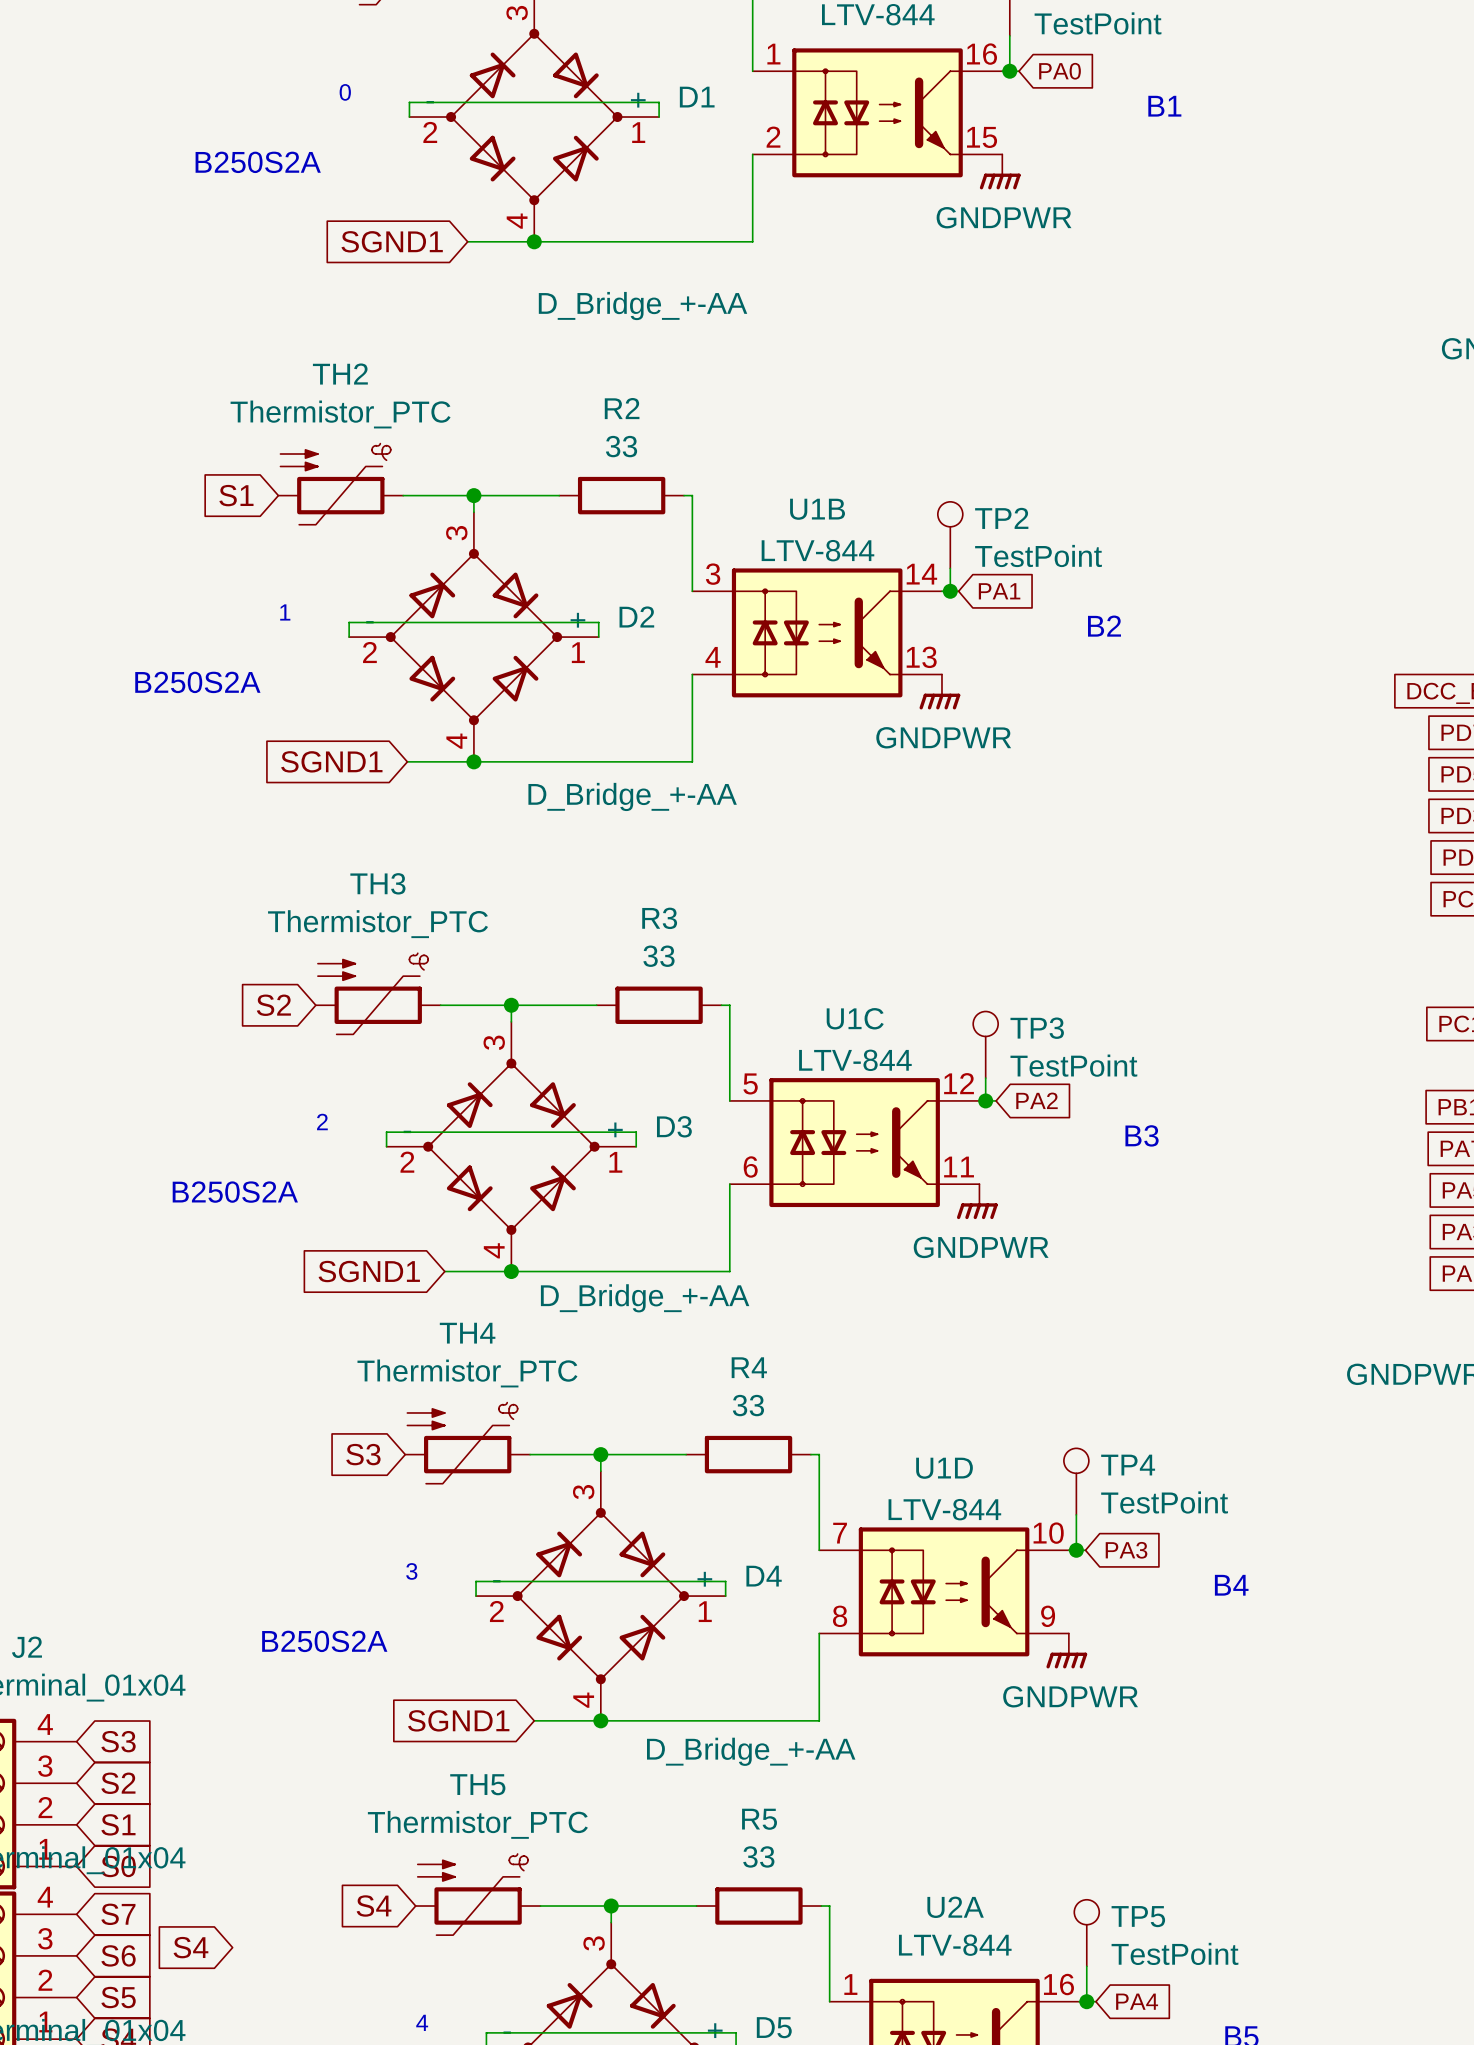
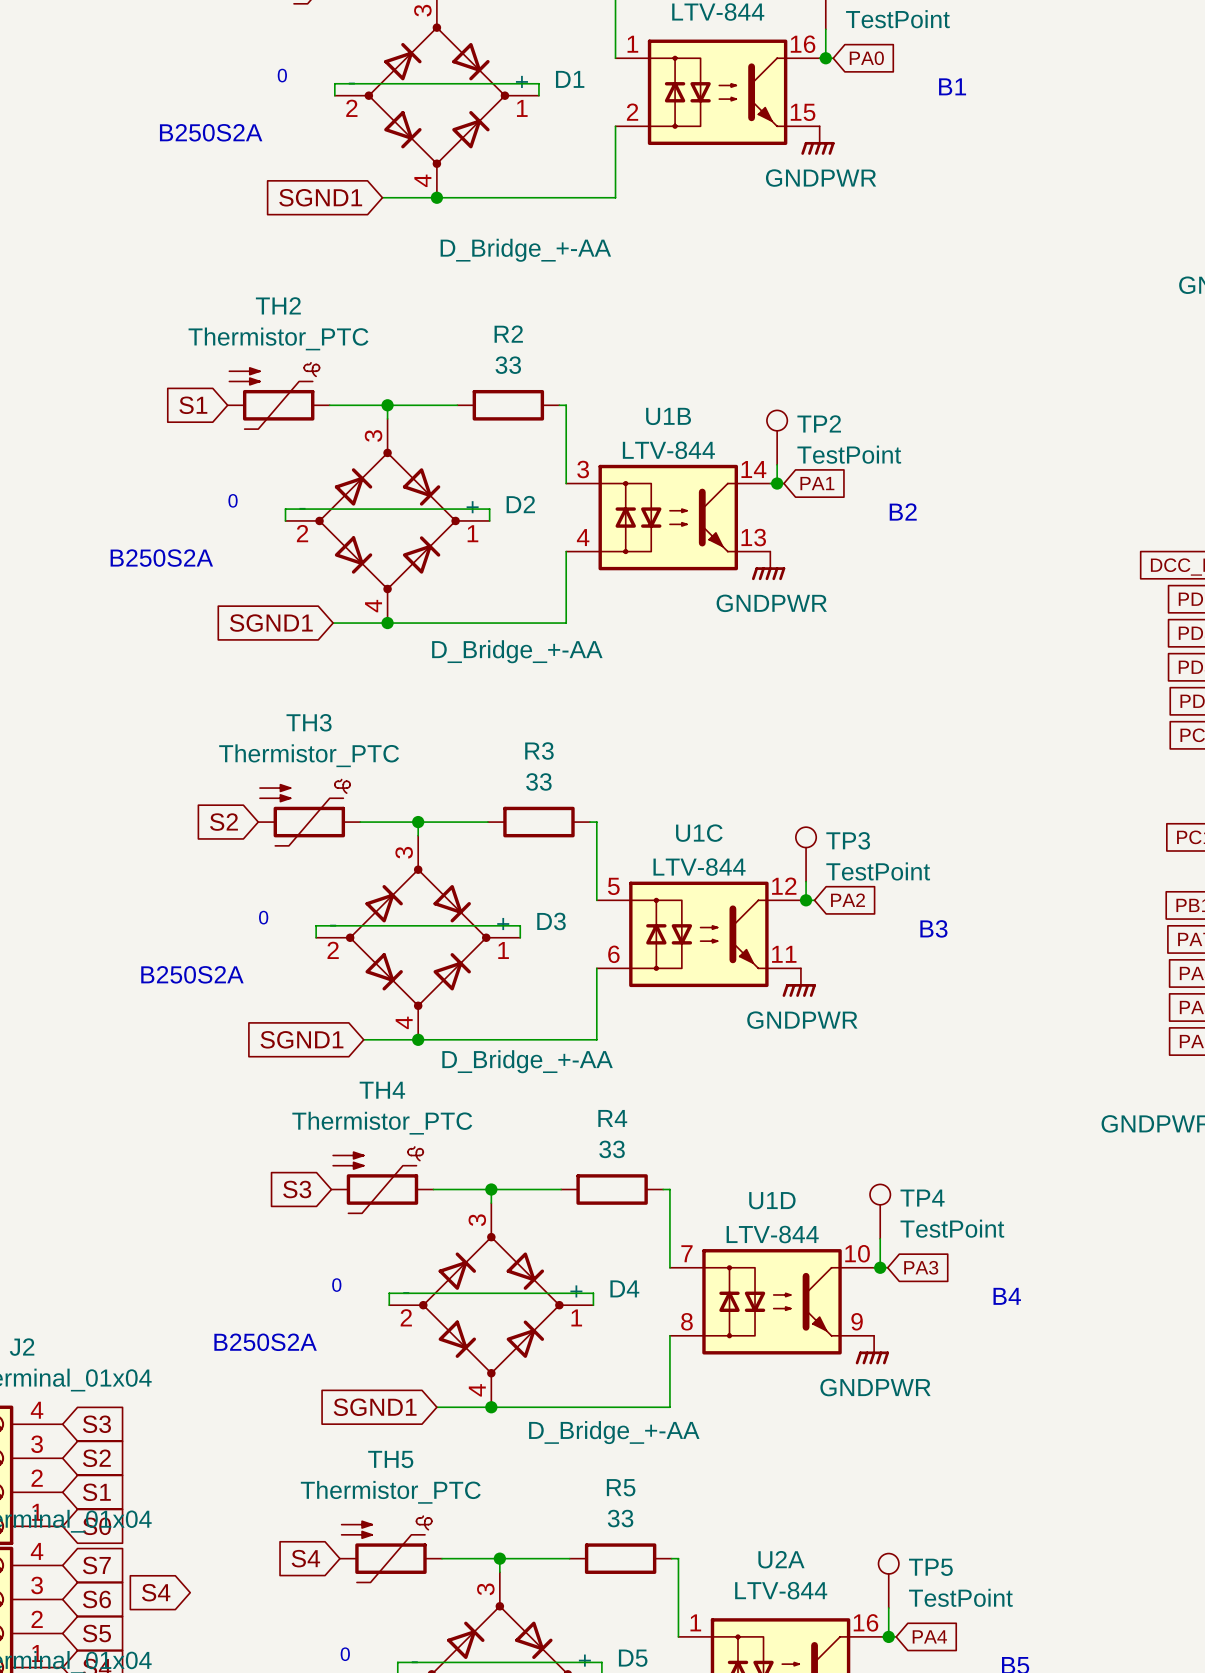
text: 1 (285, 612) -> 0 (233, 500)
text: 2 (322, 1122) -> 0 (263, 917)
text: 3 (411, 1571) -> 0 (336, 1285)
text: 4 (422, 2022) -> 0 (345, 1654)

